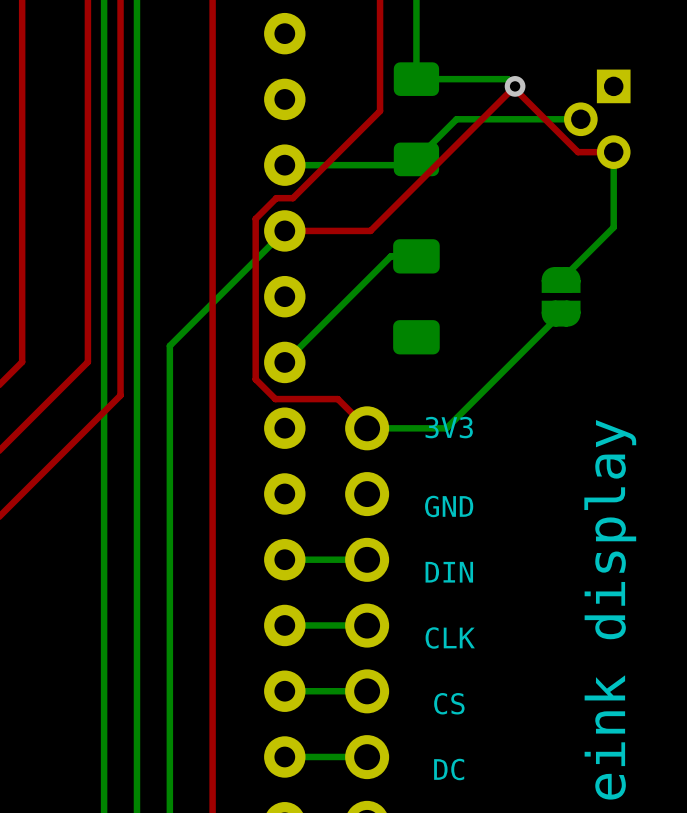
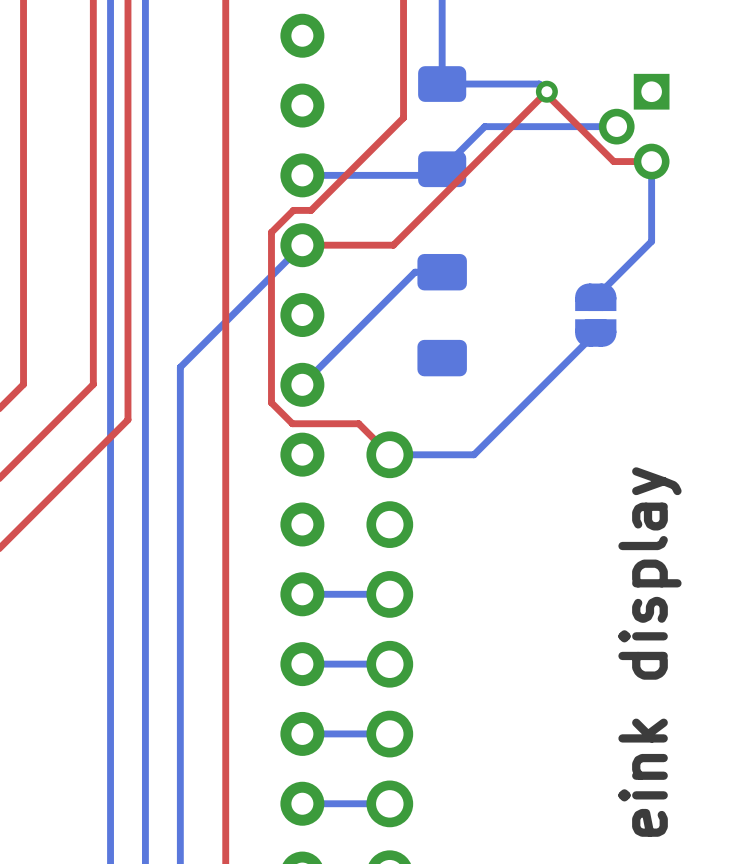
text: 3V3 (449, 427) -> none
text: GND (449, 506) -> none
text: DIN (449, 572) -> none
text: CLK (450, 637) -> none
text: CS (449, 703) -> none
text: DC (449, 769) -> none

